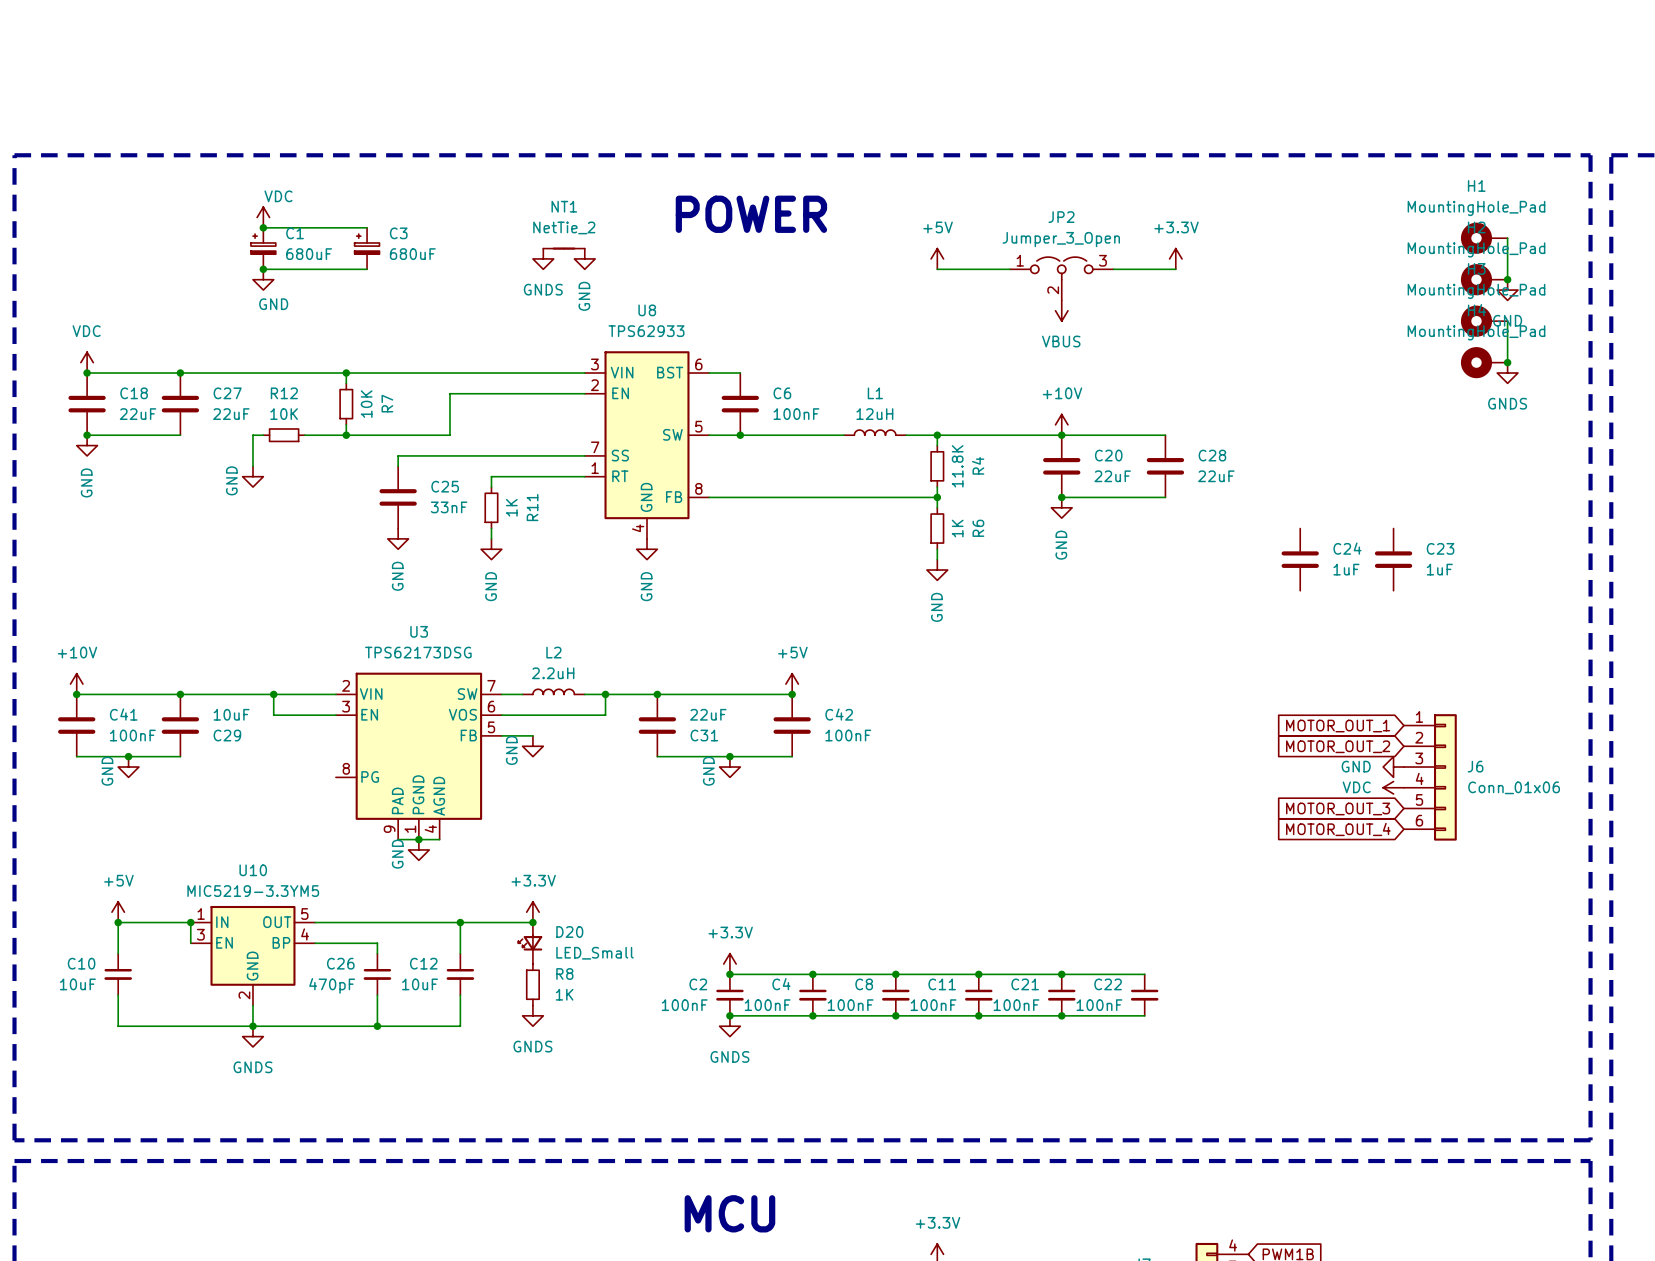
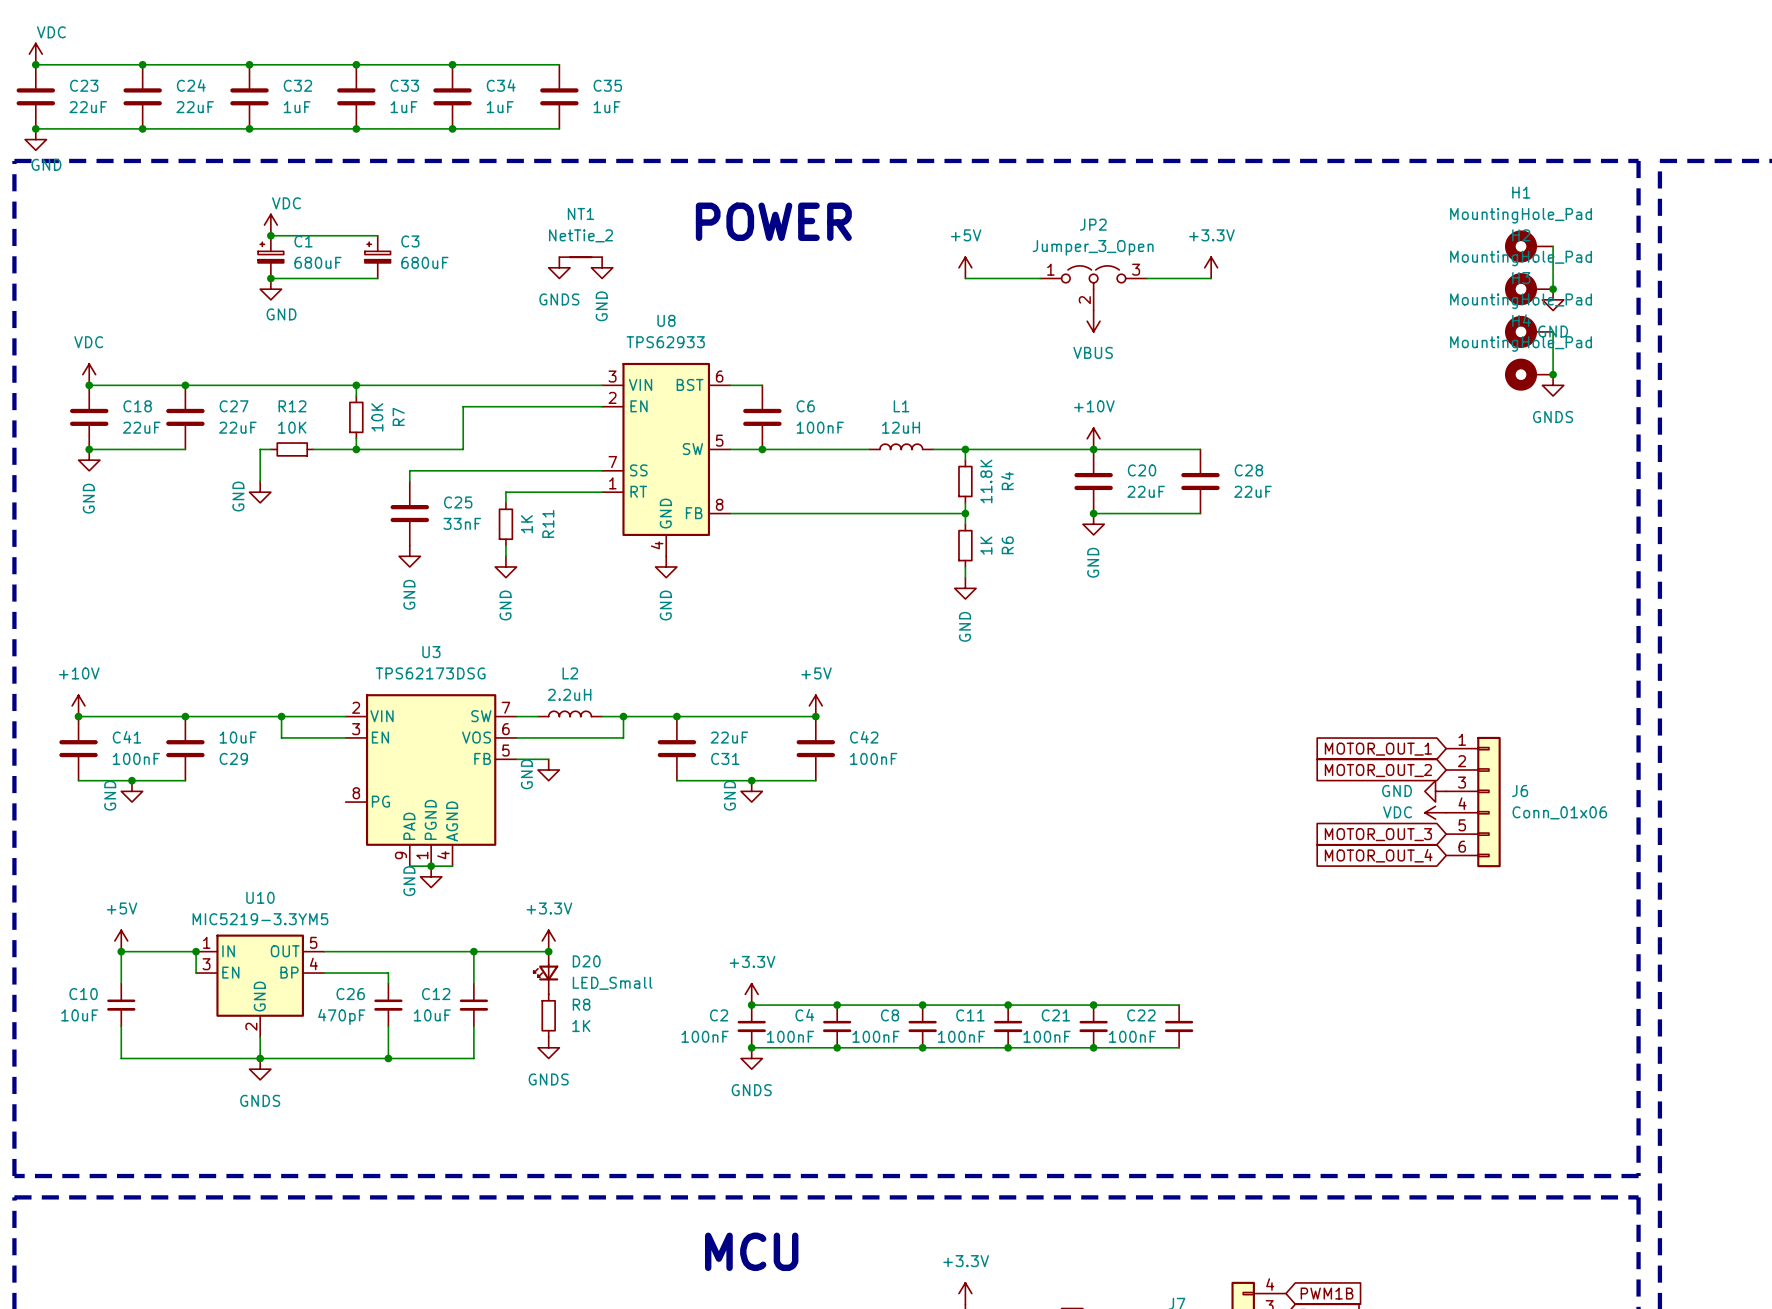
power symbol: none -> VDC (35, 54)
wire: none -> (35, 64) (559, 64)
junction: none -> (35, 64)
junction: none -> (142, 64)
junction: none -> (249, 64)
junction: none -> (356, 64)
junction: none -> (452, 64)
C32: none -> 1uF (249, 96)
C33: none -> 1uF (356, 96)
C34: none -> 1uF (452, 96)
C35: none -> 1uF (559, 96)
wire: none -> (35, 128) (559, 128)
junction: none -> (35, 128)
junction: none -> (142, 128)
junction: none -> (249, 128)
junction: none -> (356, 128)
junction: none -> (452, 128)
power symbol: none -> GND (35, 139)
C24 position: (1300, 559) -> (142, 96)
C23 position: (1393, 559) -> (35, 96)
C24 value: 1uF (1346, 569) -> 22uF (195, 107)
C23 value: 1uF (1439, 569) -> 22uF (88, 107)

